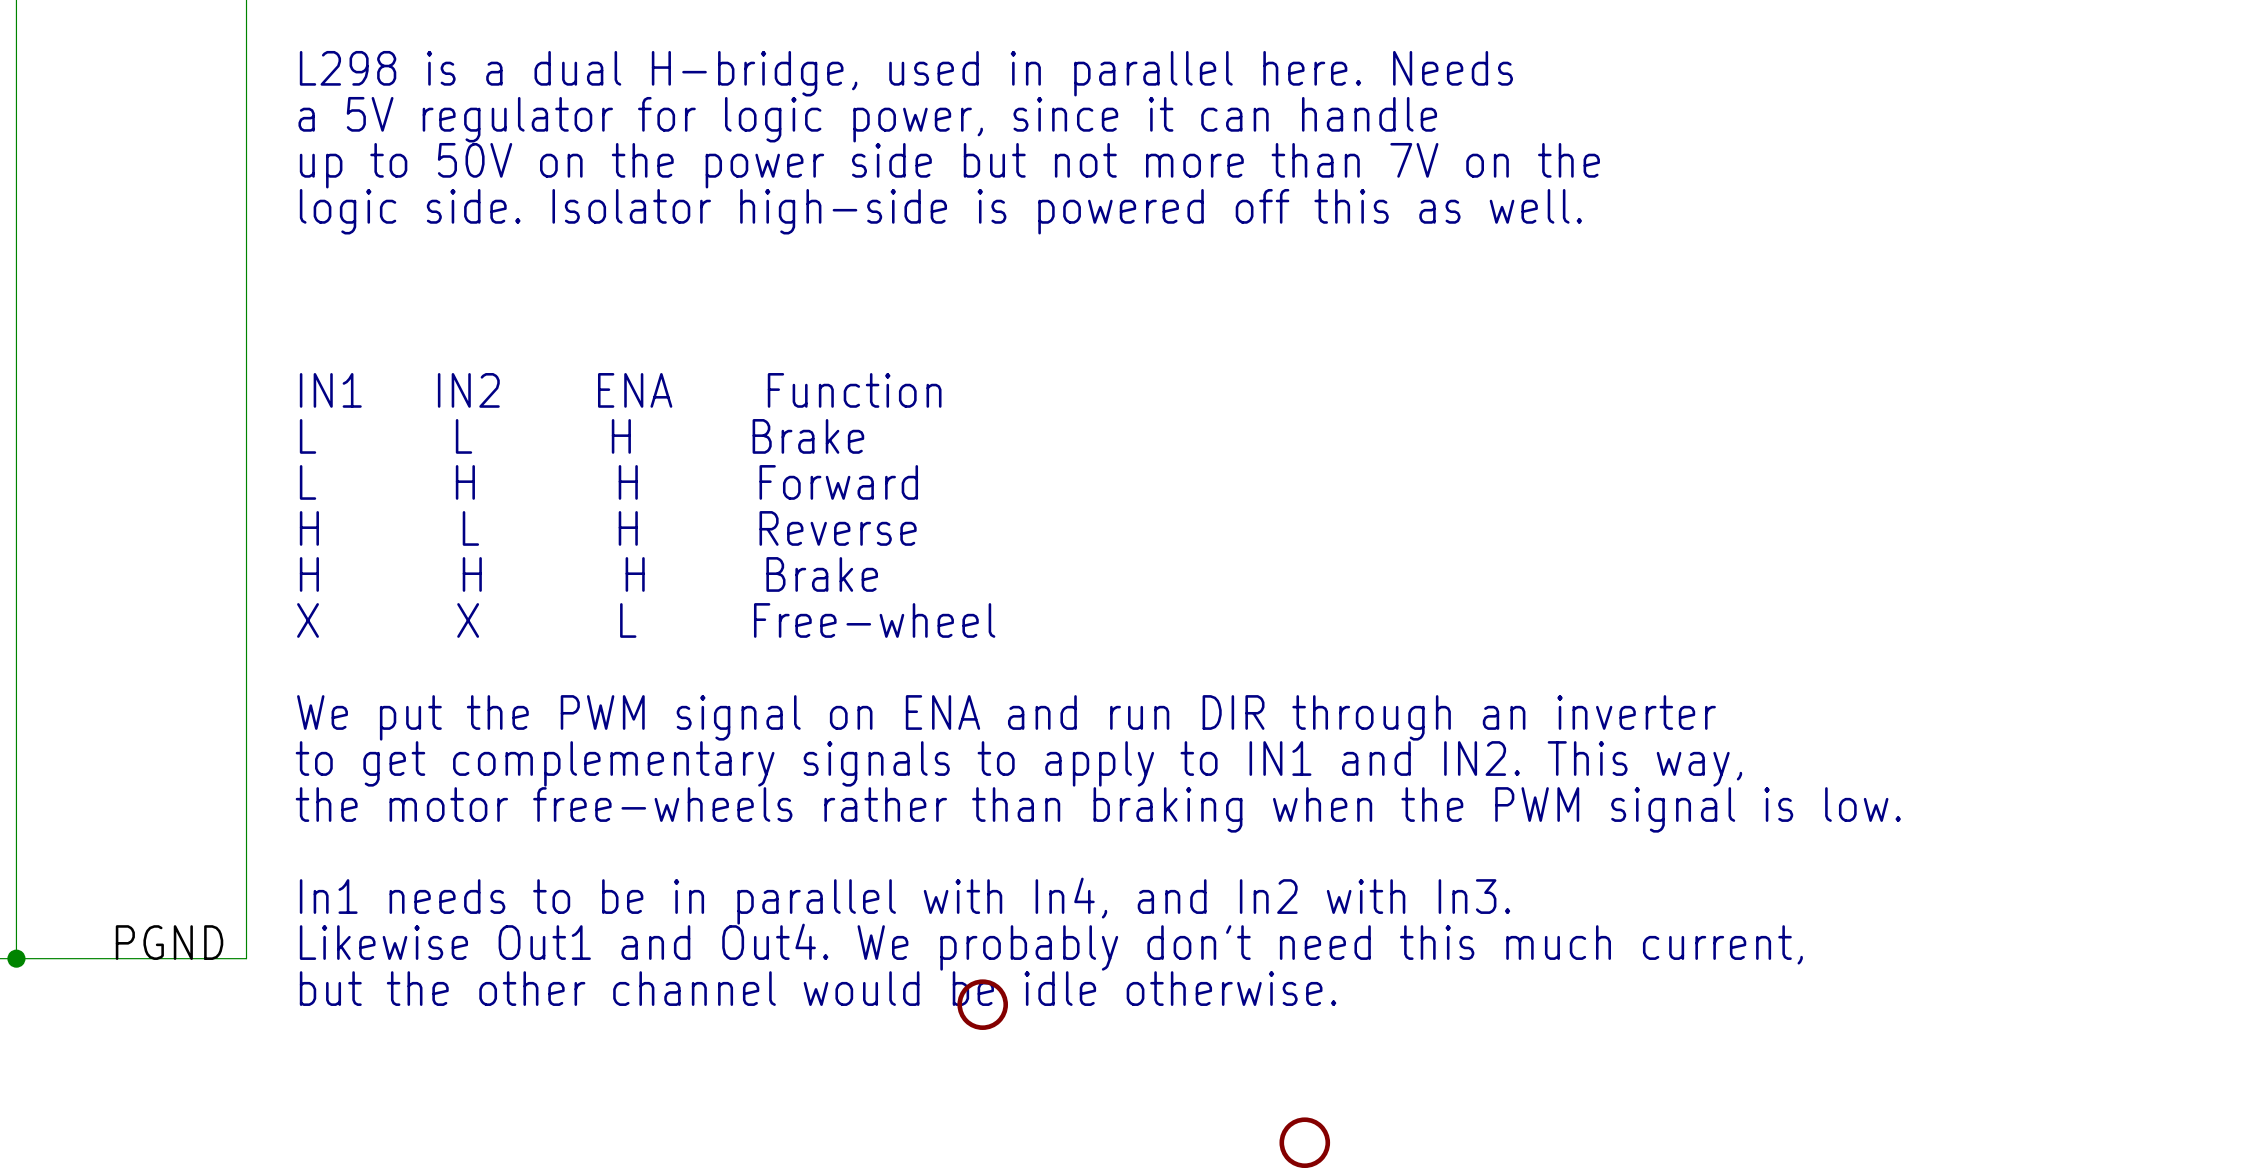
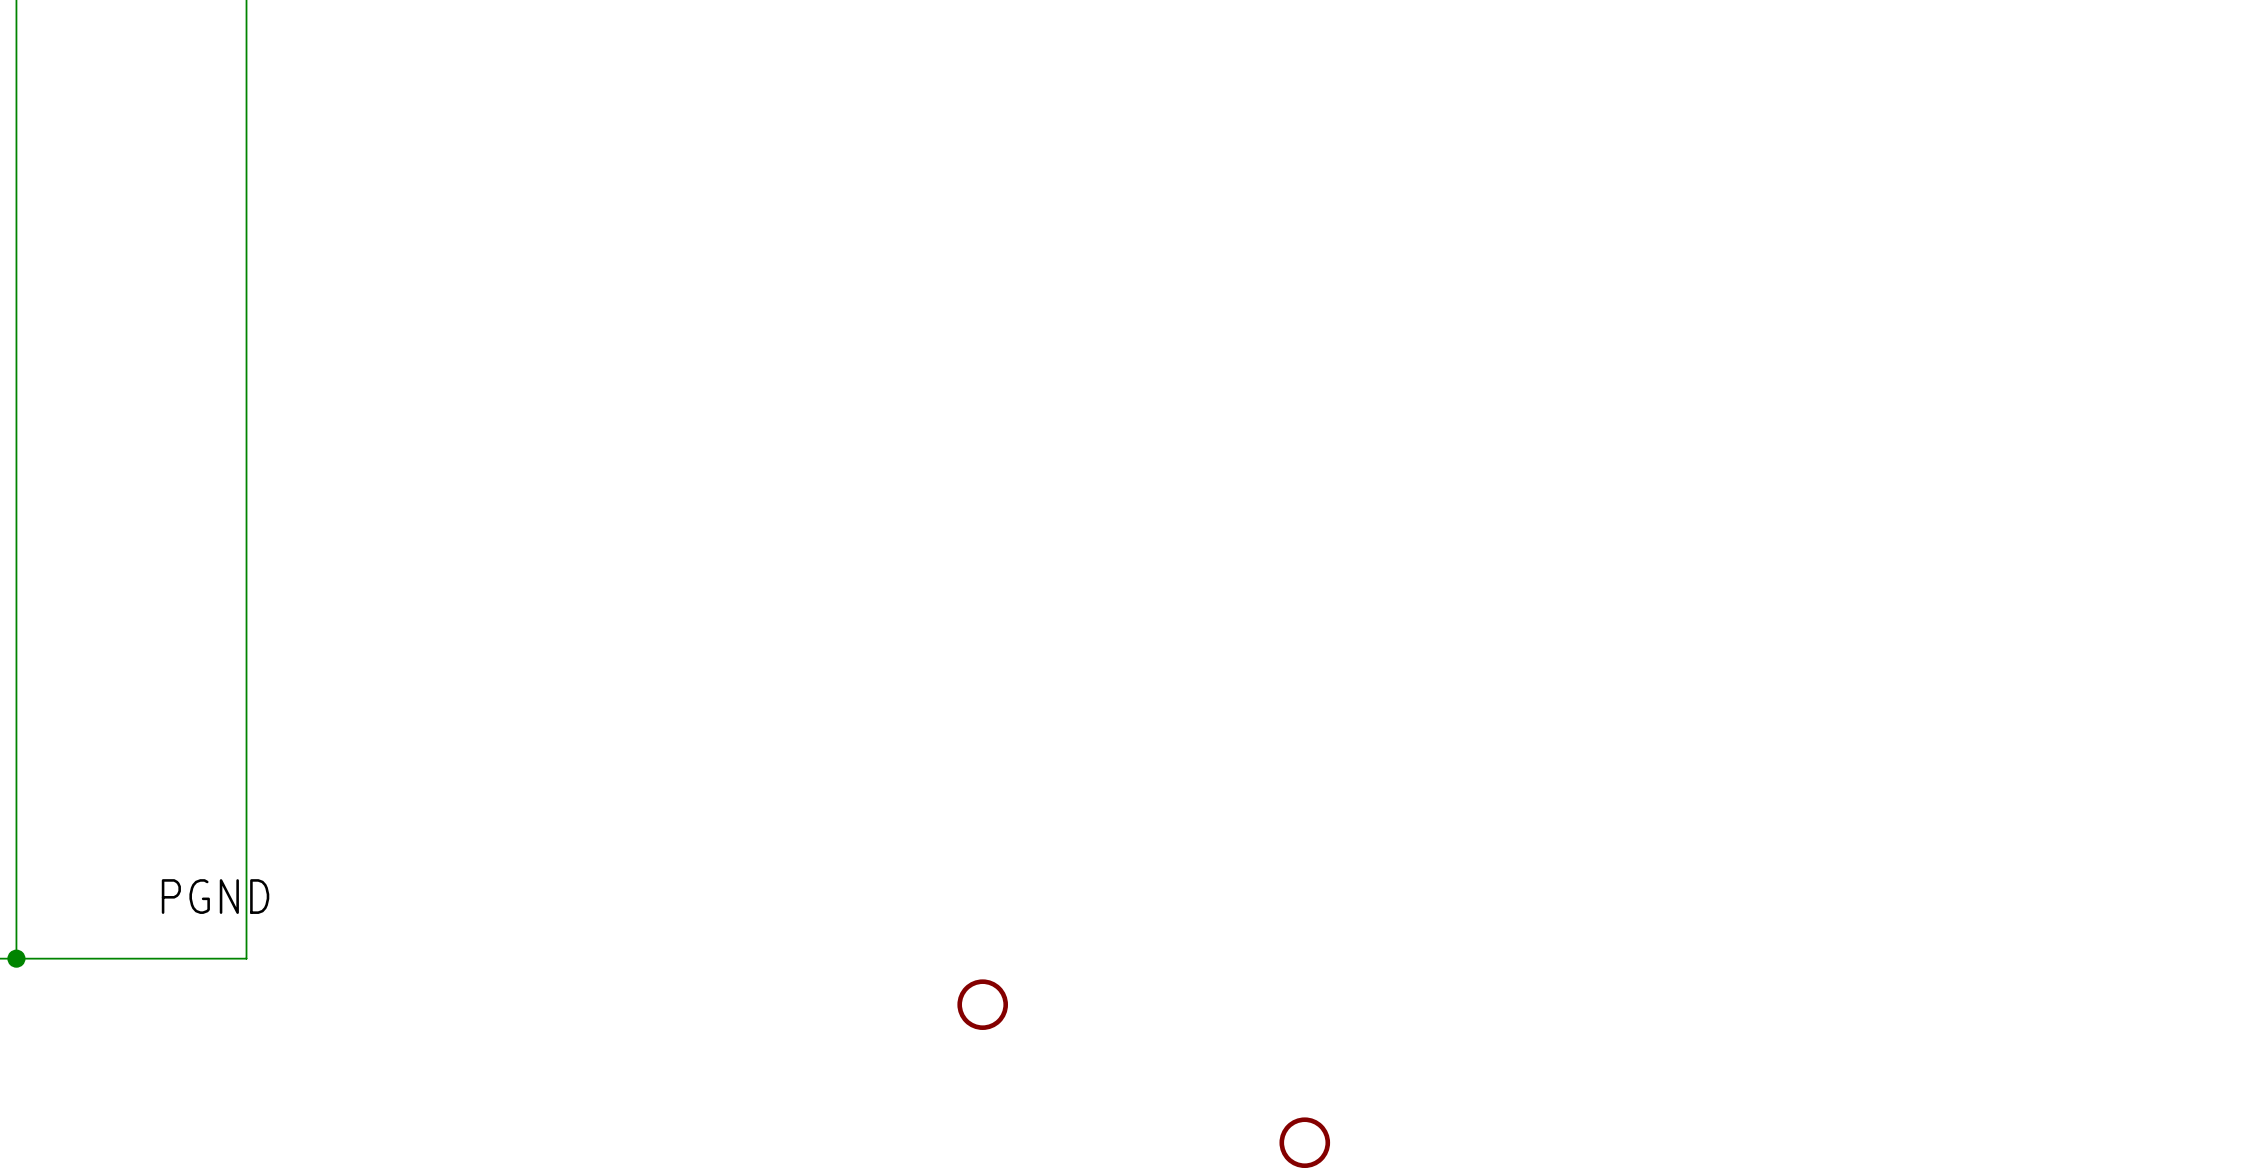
text: L298 is a dual H-bridge, used in parallel here. Needs (906, 73) -> none
text: a 5V regulator for logic power, since it can handle (867, 119) -> none
text: up to 50V on the power side but not more than 7V on the (949, 165) -> none
text: logic side. Isolator high-side is powered off this as well. (940, 211) -> none
text: IN1 IN2 ENA Function (620, 390) -> none
text: L L H Brake (582, 436) -> none
text: L H H Forward (608, 482) -> none
text: H L H Reverse (608, 528) -> none
text: H H H Brake (588, 574) -> none
text: X X L Free-wheel (646, 620) -> none
text: We put the PWM signal on ENA and run DIR through an inverter (1006, 717) -> none
text: to get complementary signals to apply to IN1 and IN2. This way, (1018, 763) -> none
text: the motor free-wheels rather than braking when the PWM signal is low. (1098, 809) -> none
text: In1 needs to be in parallel with In4, and In2 with In3. (905, 901) -> none
label position: PGND (169, 942) -> PGND (215, 896)
text: Likewise Out1 and Out4. We probably don't need this much current, (1051, 947) -> none
text: but the other channel would be idle otherwise. (818, 988) -> none

